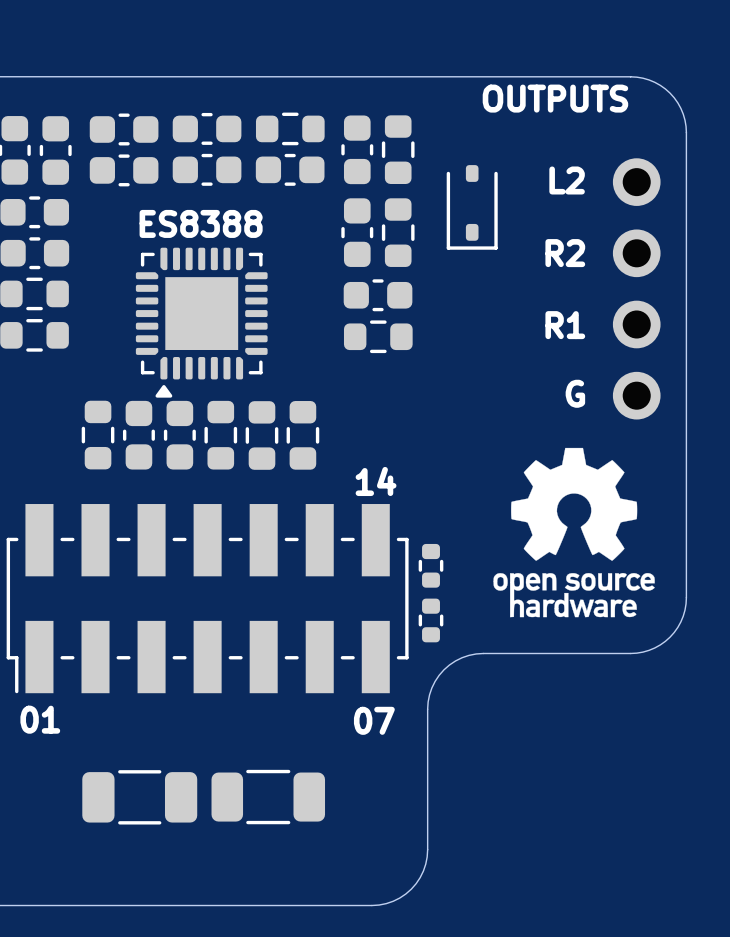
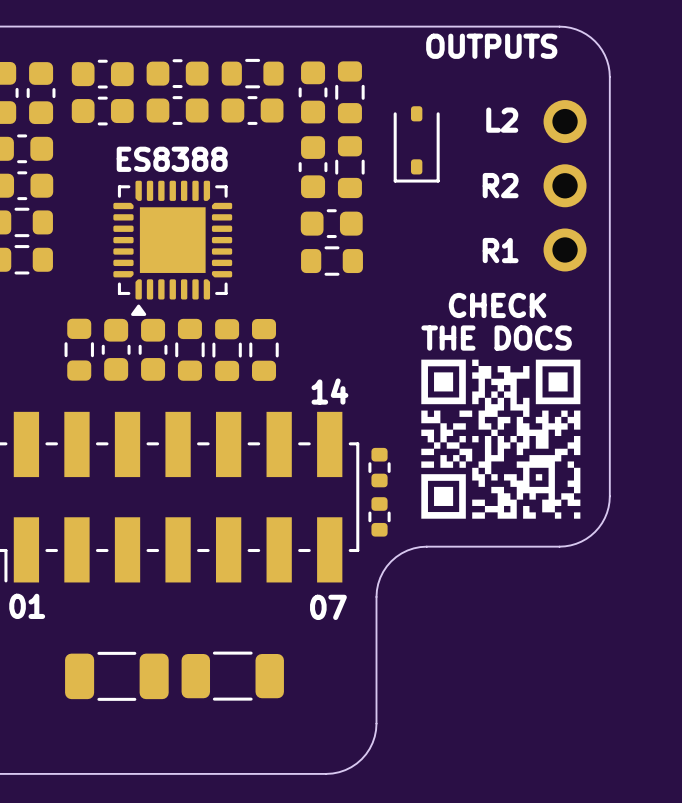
part: (636, 288) -> none
text: none -> CHECK (497, 305)
text: G (575, 393) -> none
text: none -> THE DOCS (496, 338)
drawing shape: [493, 447, 655, 618] -> [421, 359, 581, 519]

